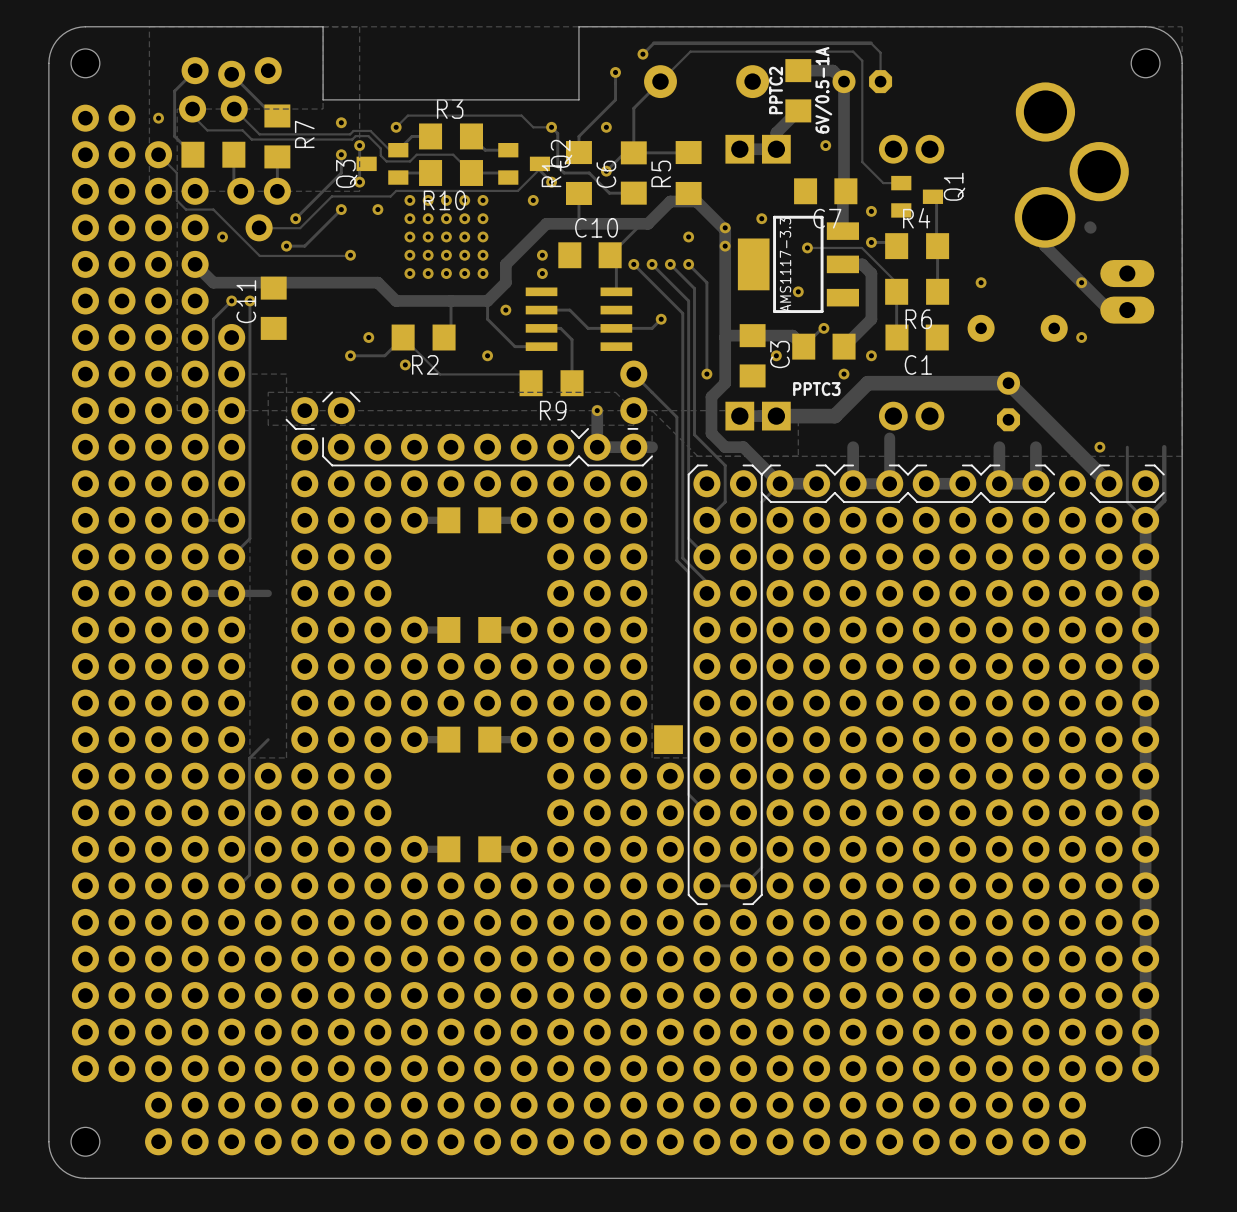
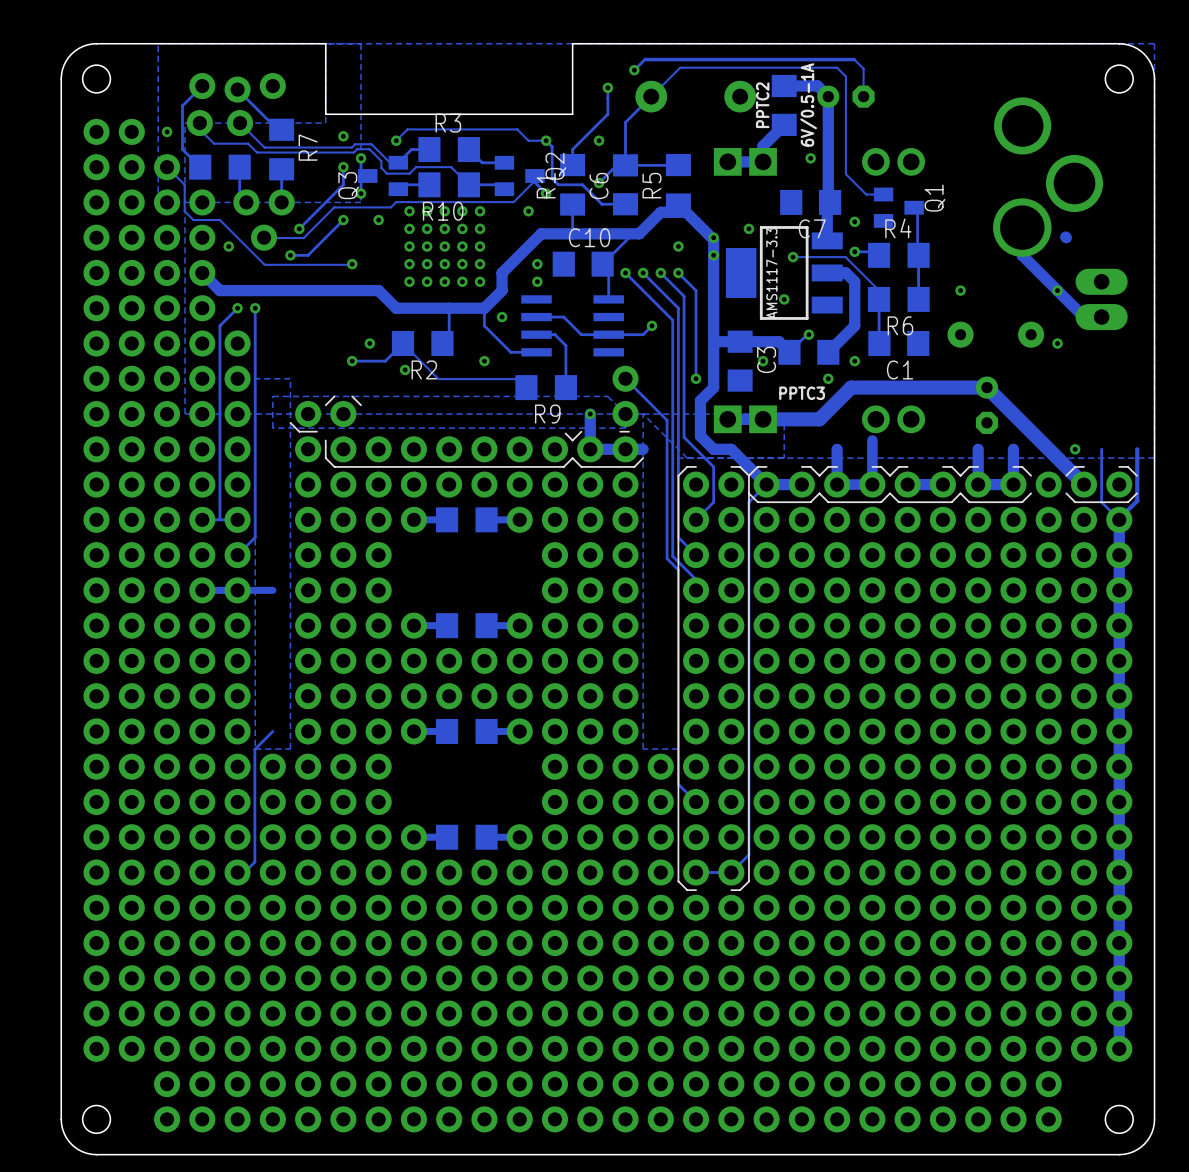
C11: (273, 308) -> none
part: (668, 739) -> none

